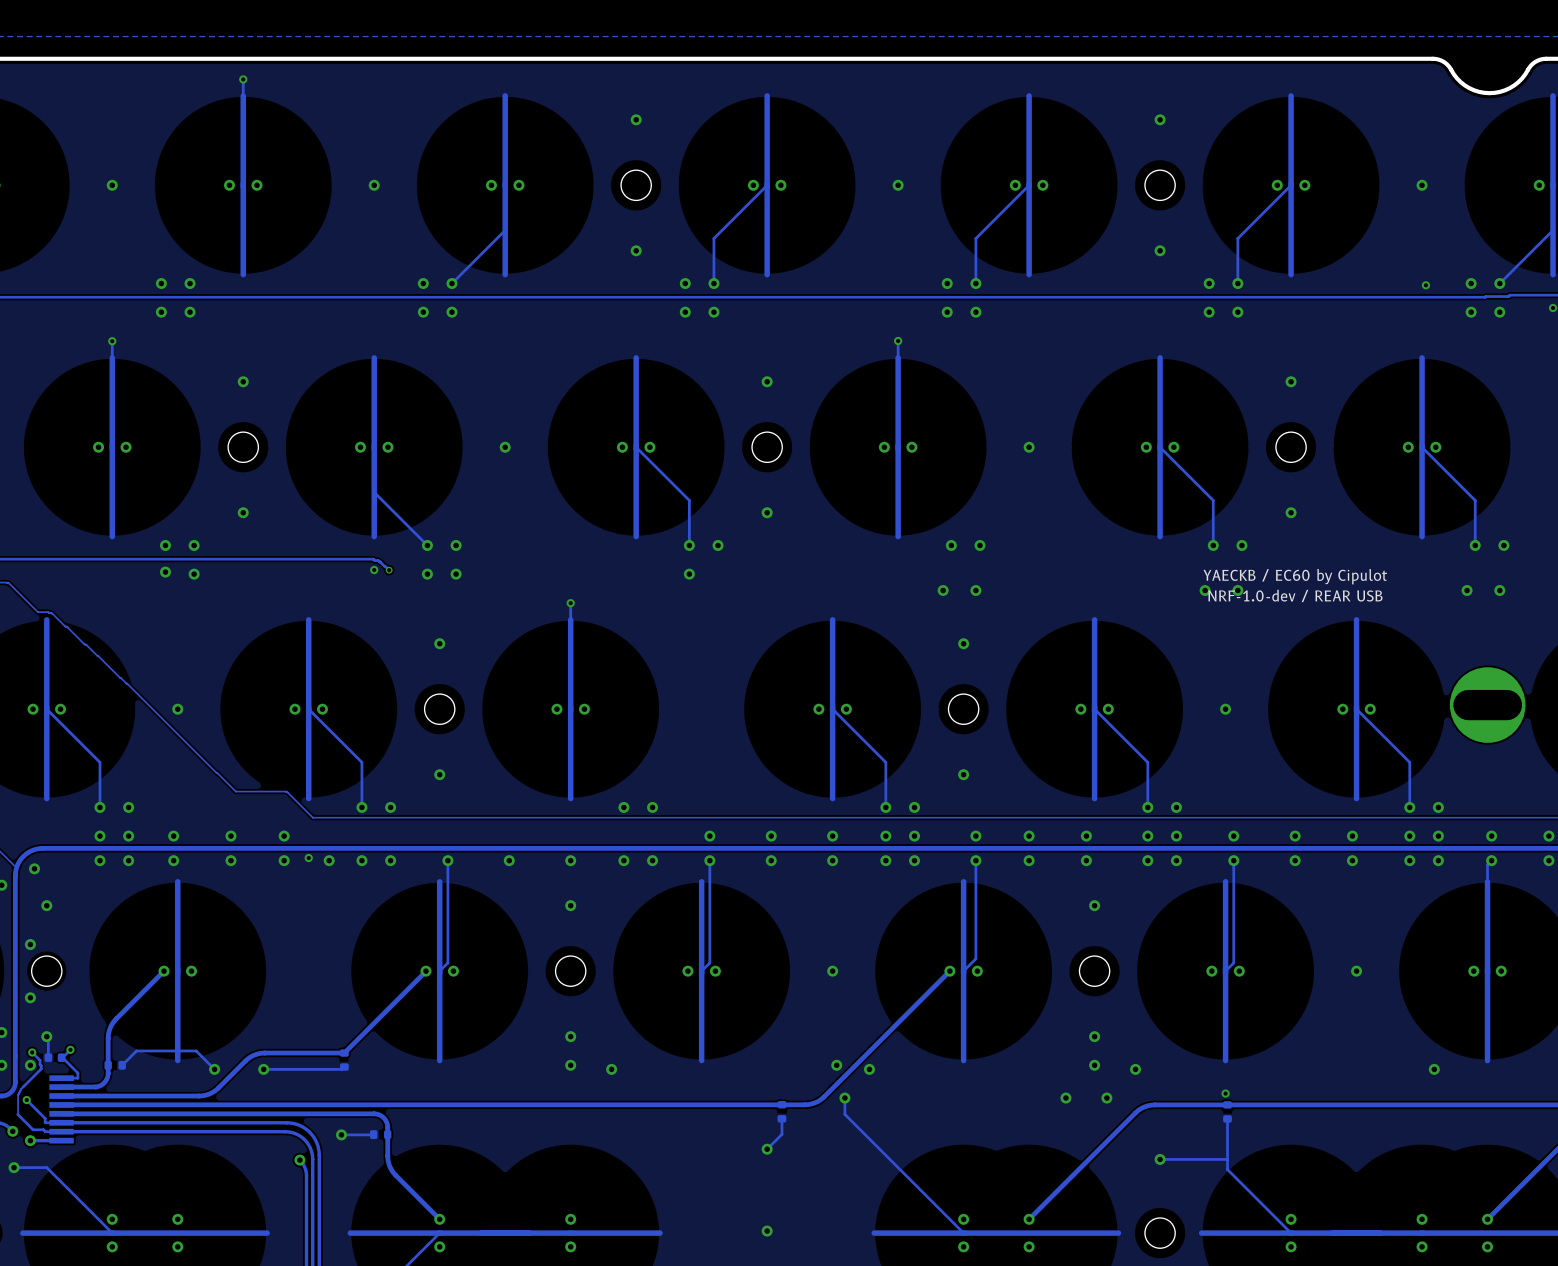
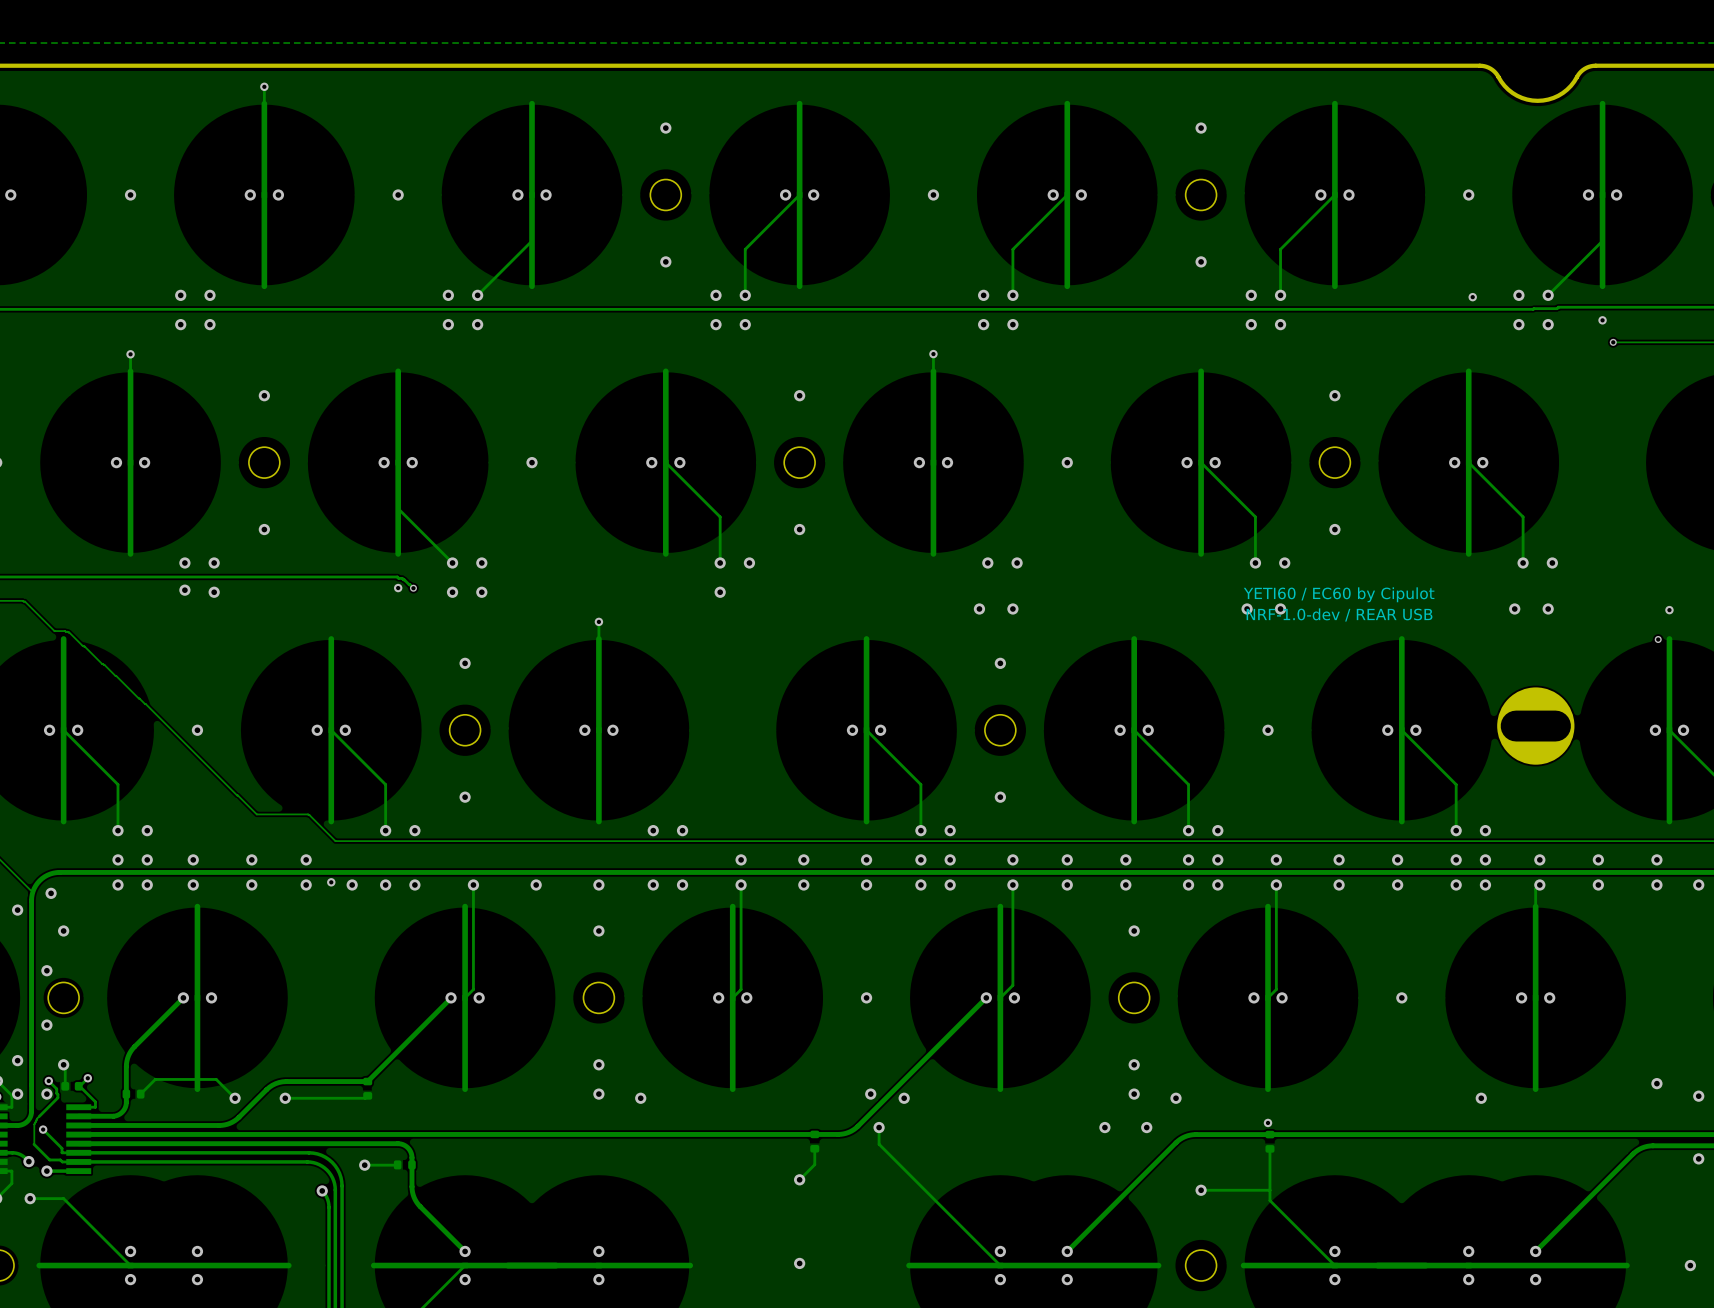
text: YAECKB / EC60 by Cipulot (1295, 576) -> YETI60 / EC60 by Cipulot (1339, 594)

